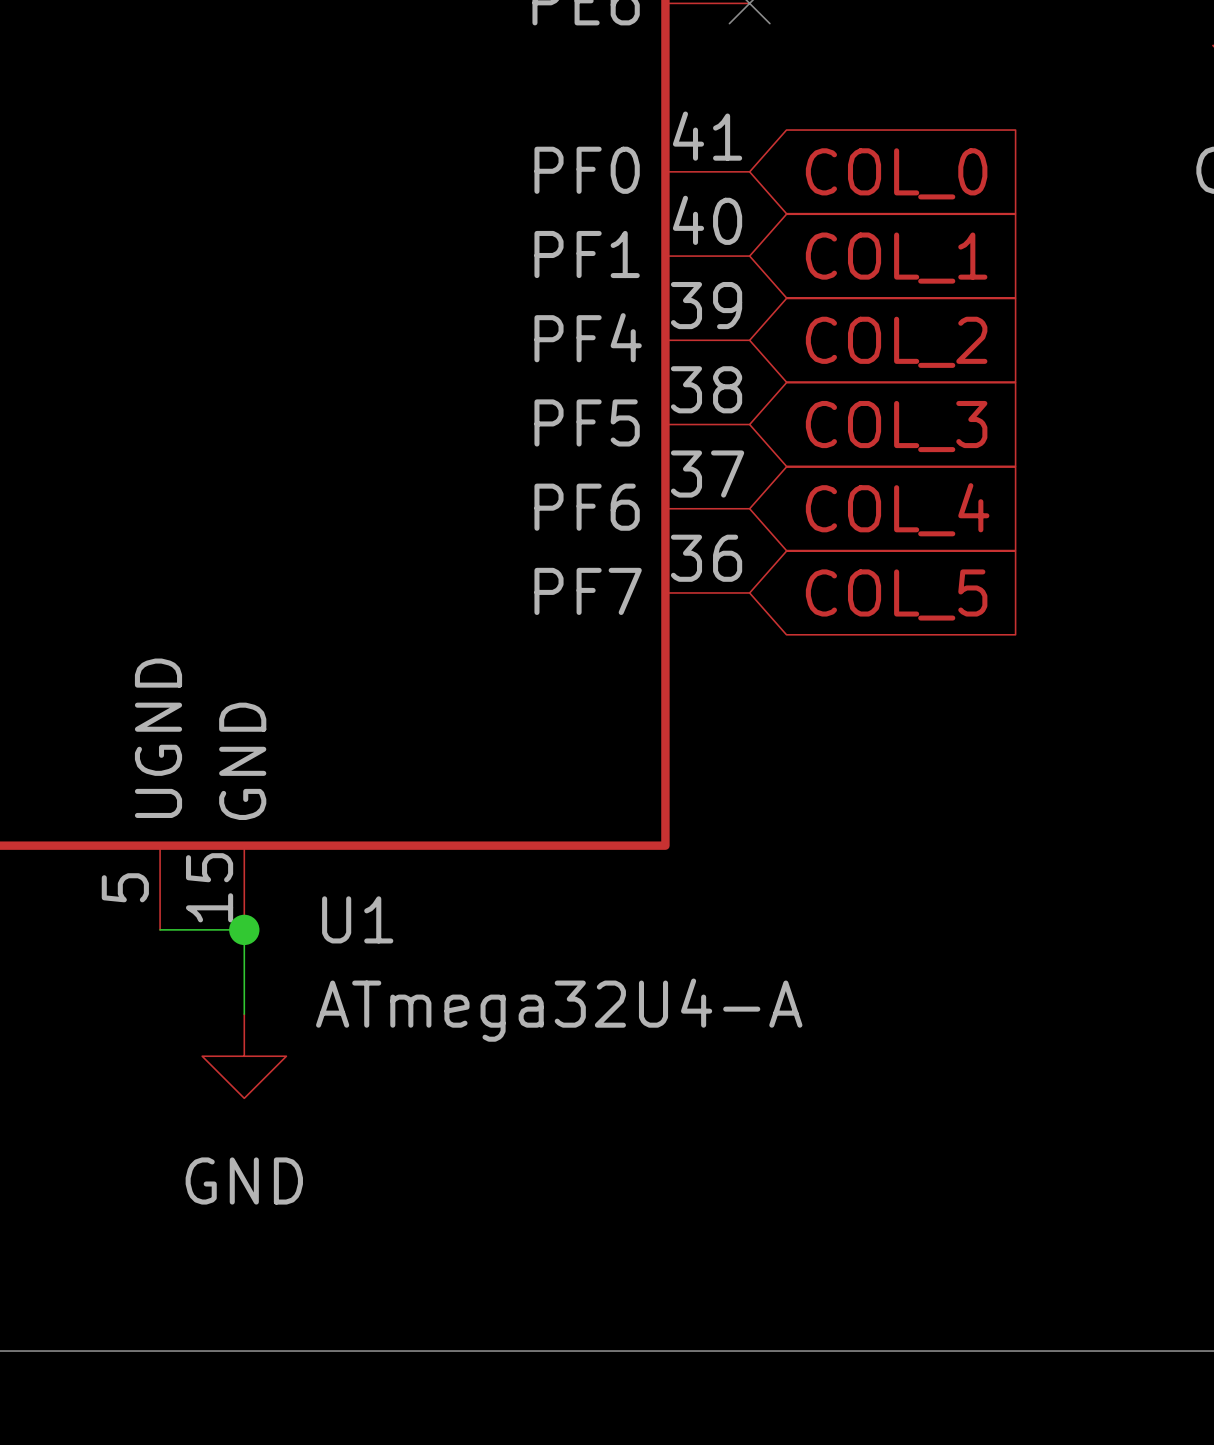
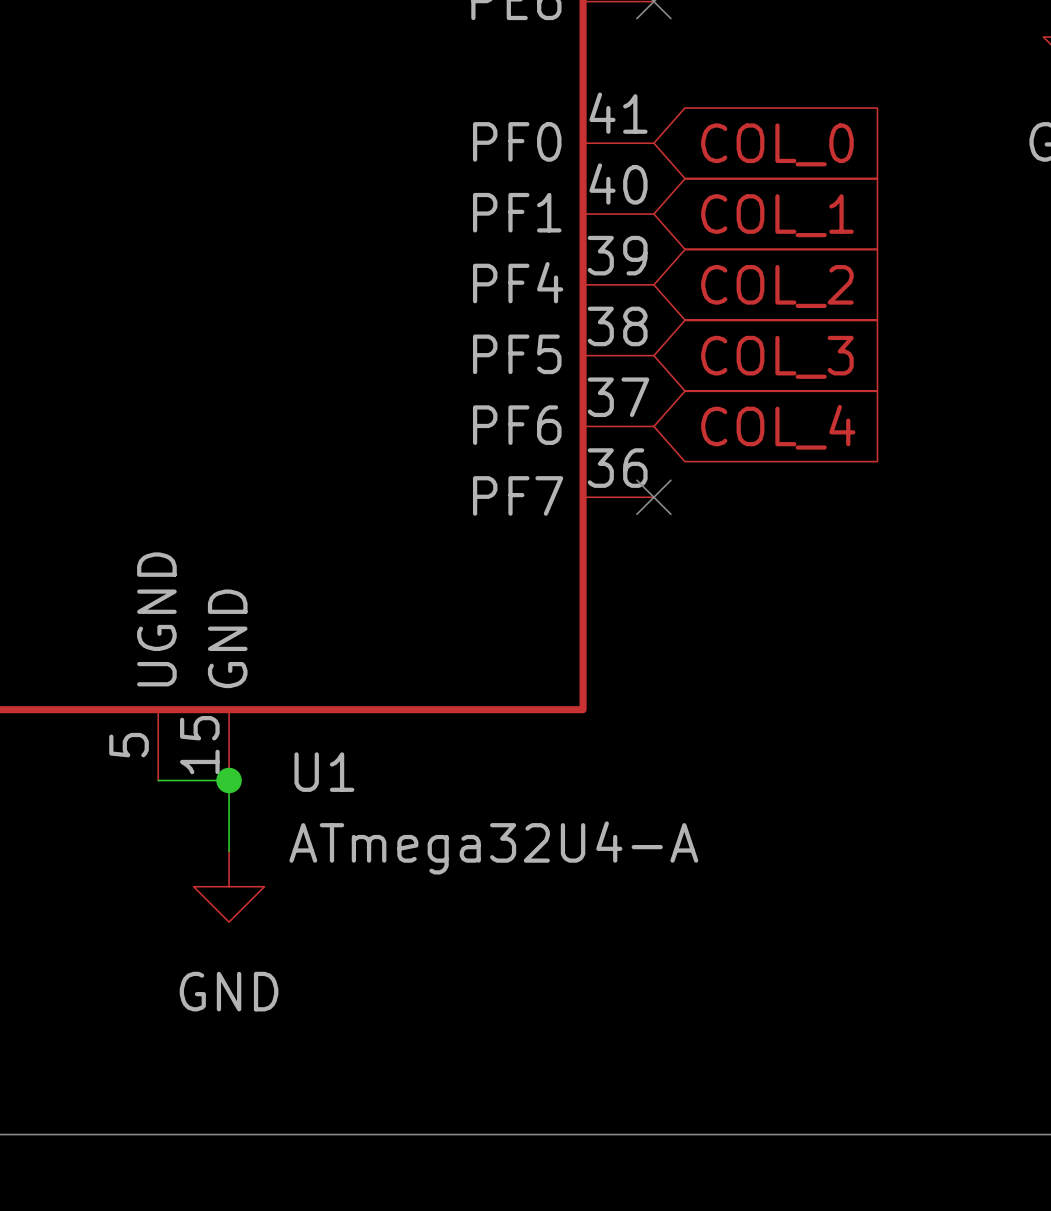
no-connect mark: none -> (653, 497)
global label: COL_5 (896, 594) -> none

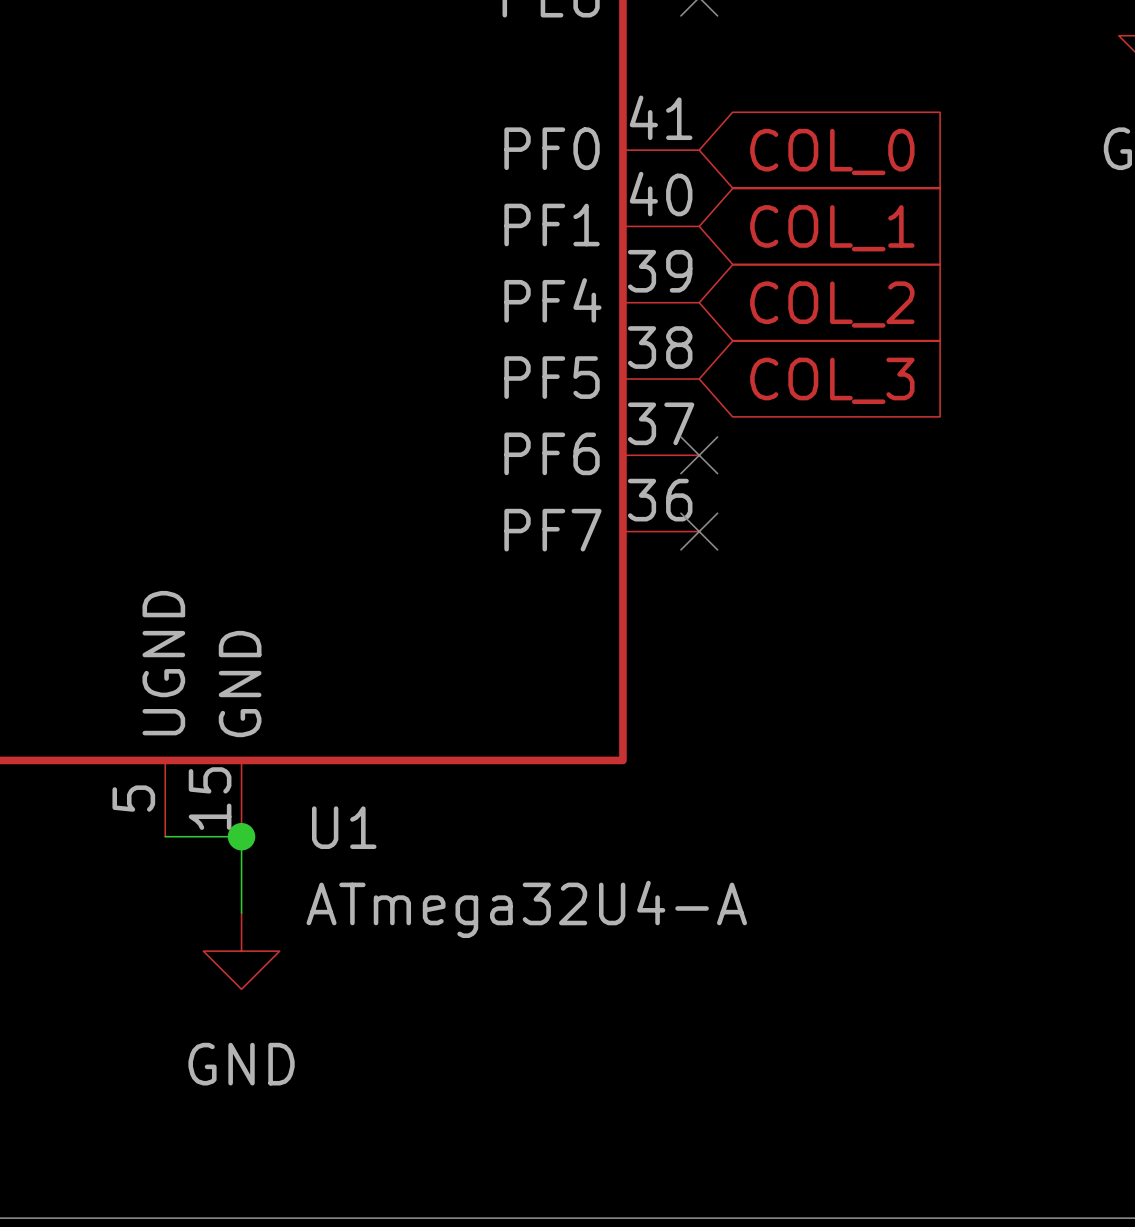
no-connect mark: none -> (699, 455)
global label: COL_4 (778, 427) -> none

